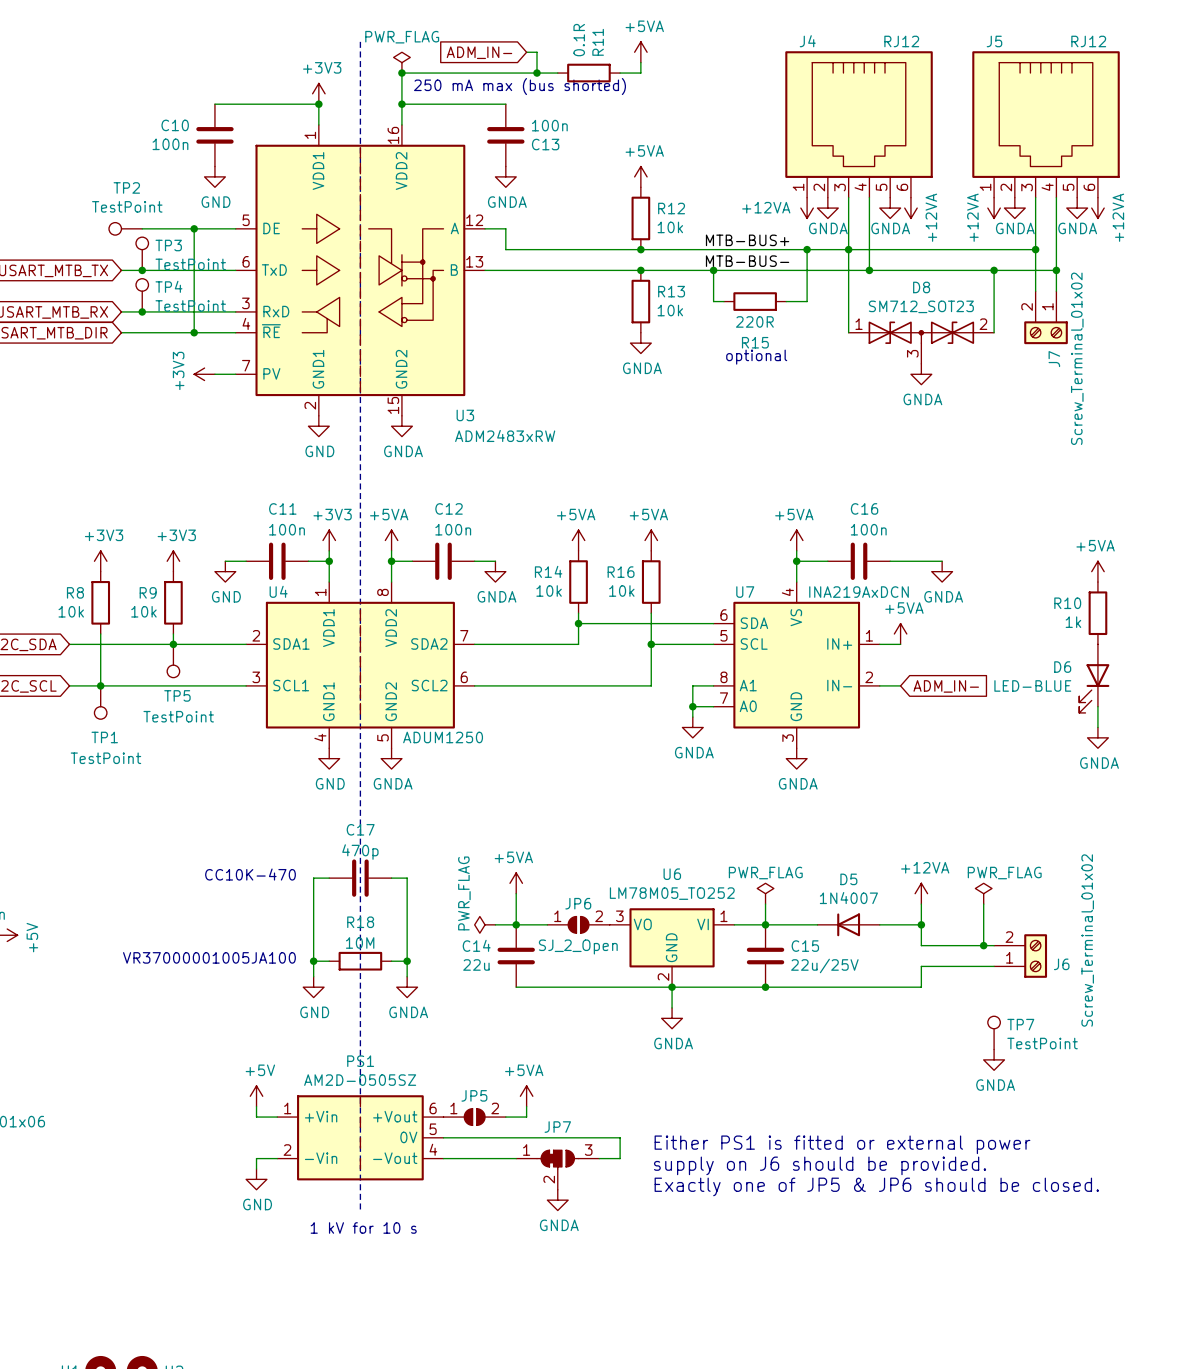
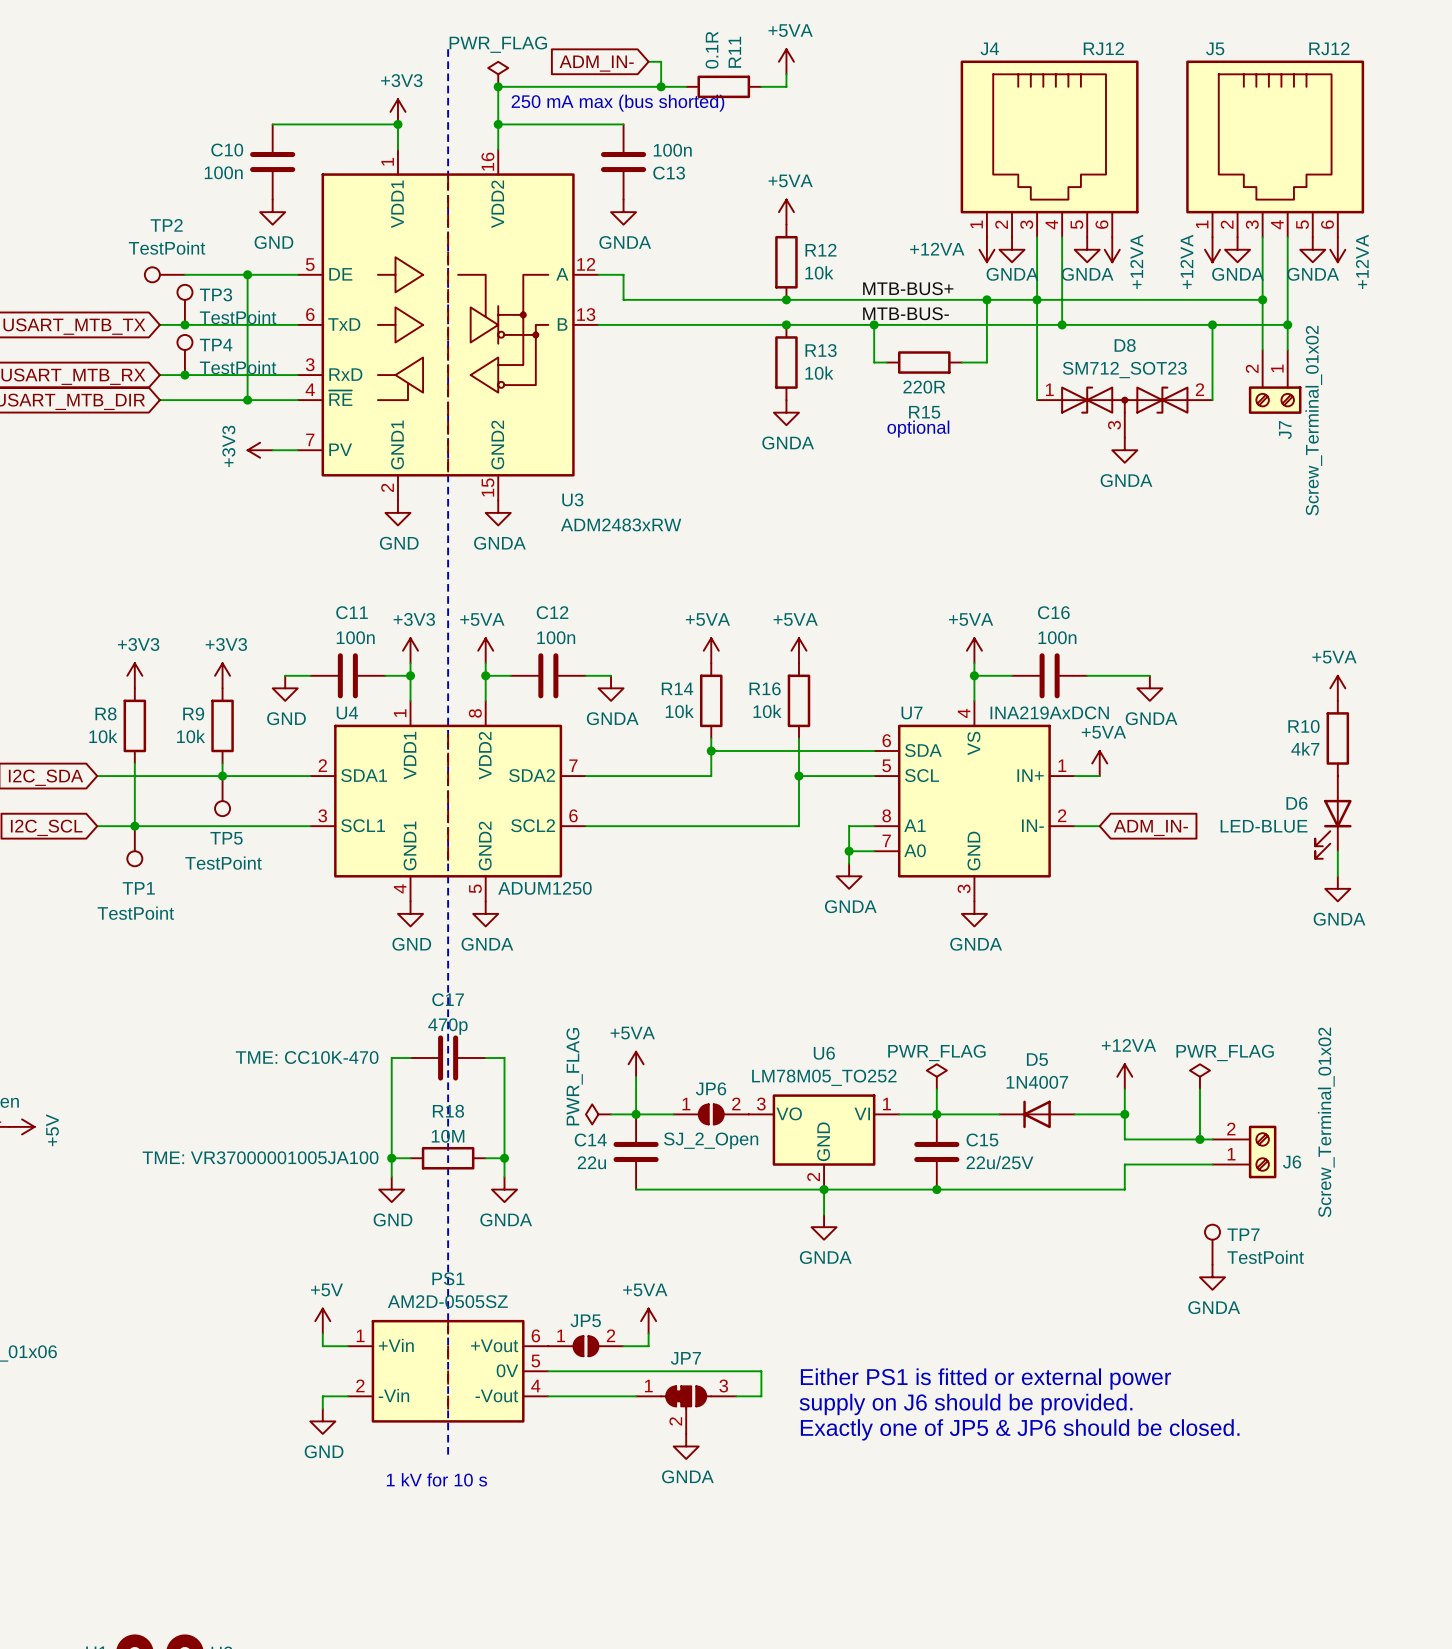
R10 value: 1k (1073, 622) -> 4k7 (1305, 748)
text: CC10K-470 (250, 874) -> none
C17 text: none -> TME: CC10K-470 (307, 1057)
text: VR37000001005JA100 (209, 957) -> none
R18 text: none -> TME: VR37000001005JA100 (260, 1157)

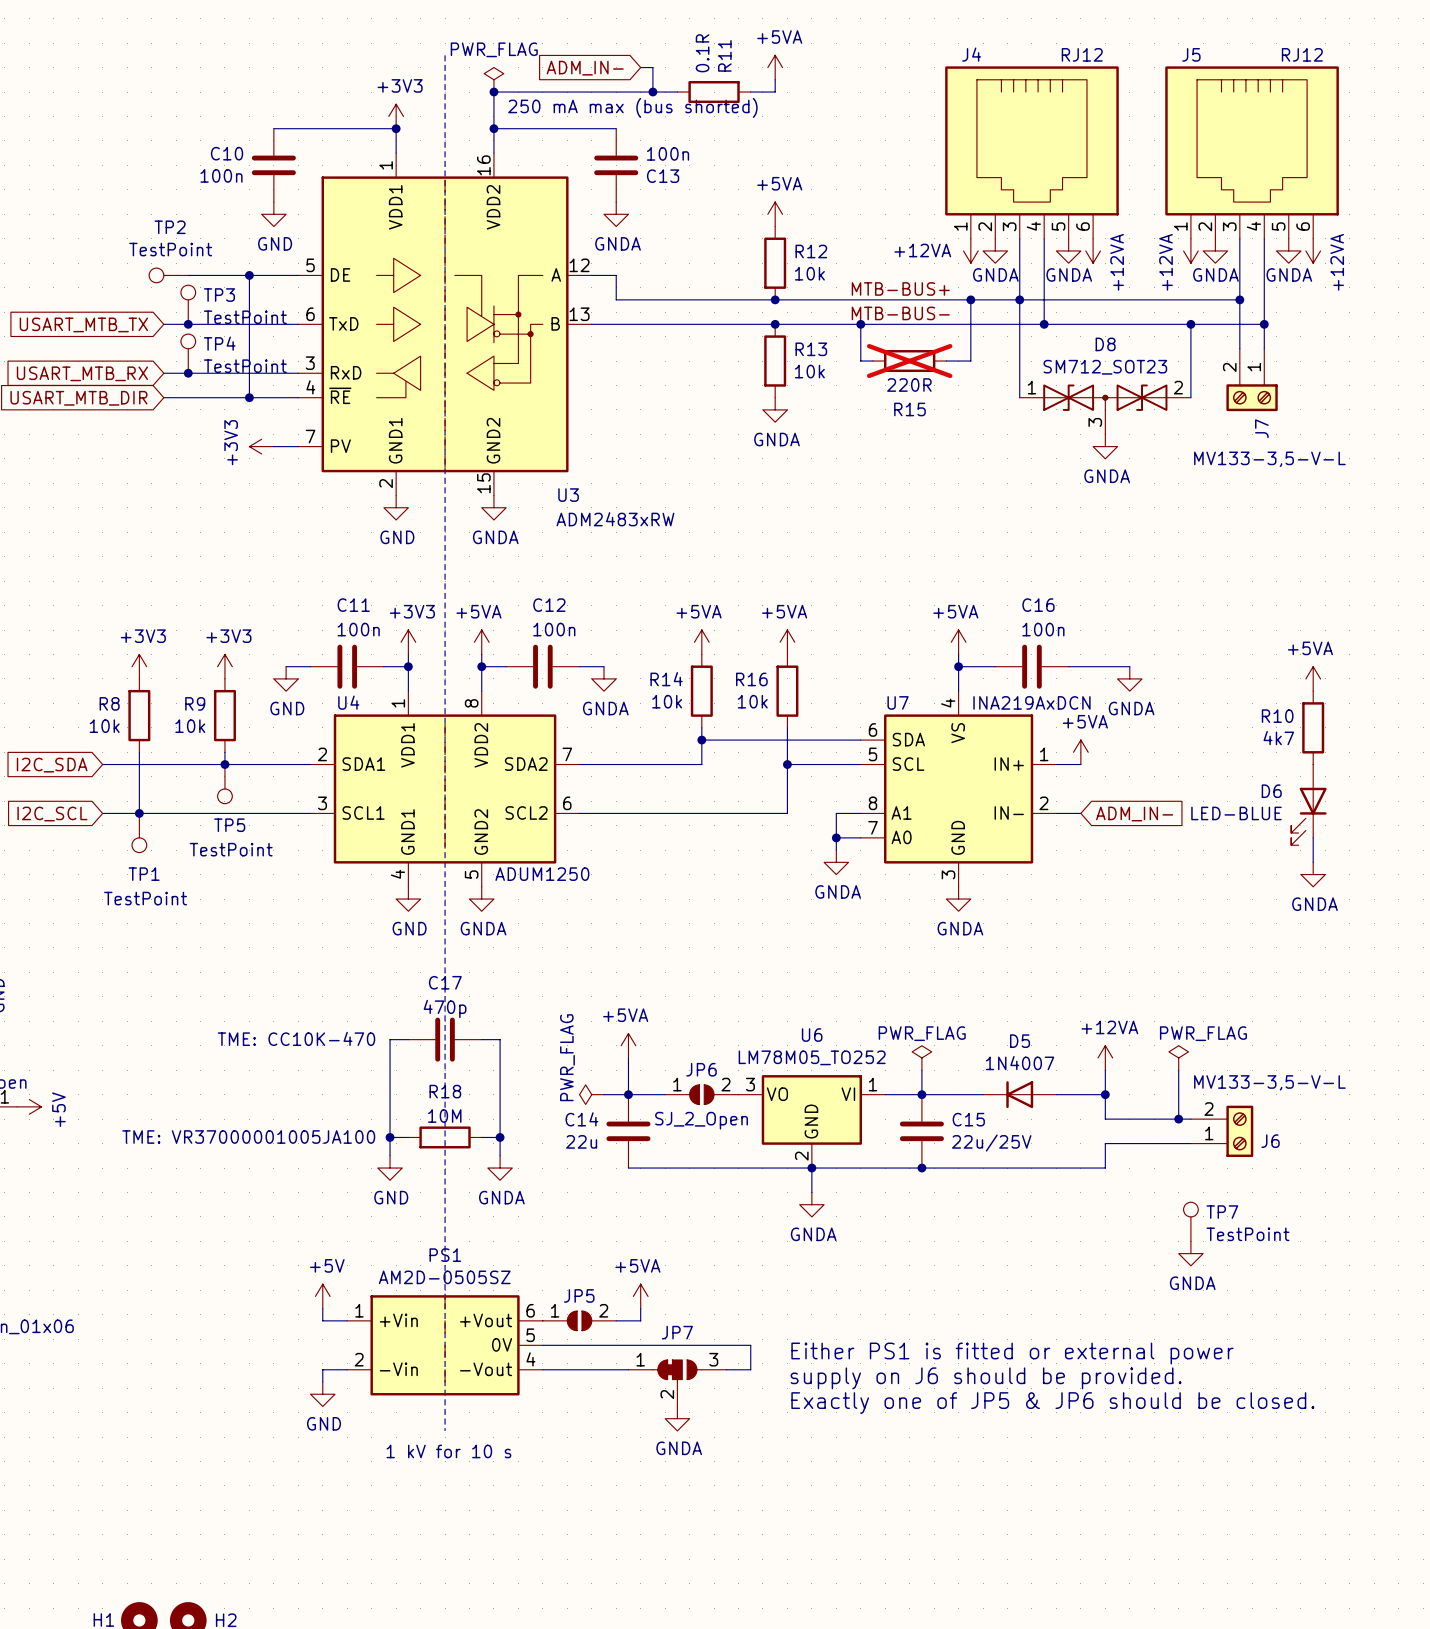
R15 do-not-place cross: none -> (909, 361)
J7 value: Screw_Terminal_01x02 (1313, 420) -> MV133-3,5-V-L (1269, 459)
text: optional (918, 429) -> none
J6 value: Screw_Terminal_01x02 (1326, 1122) -> MV133-3,5-V-L (1269, 1082)

